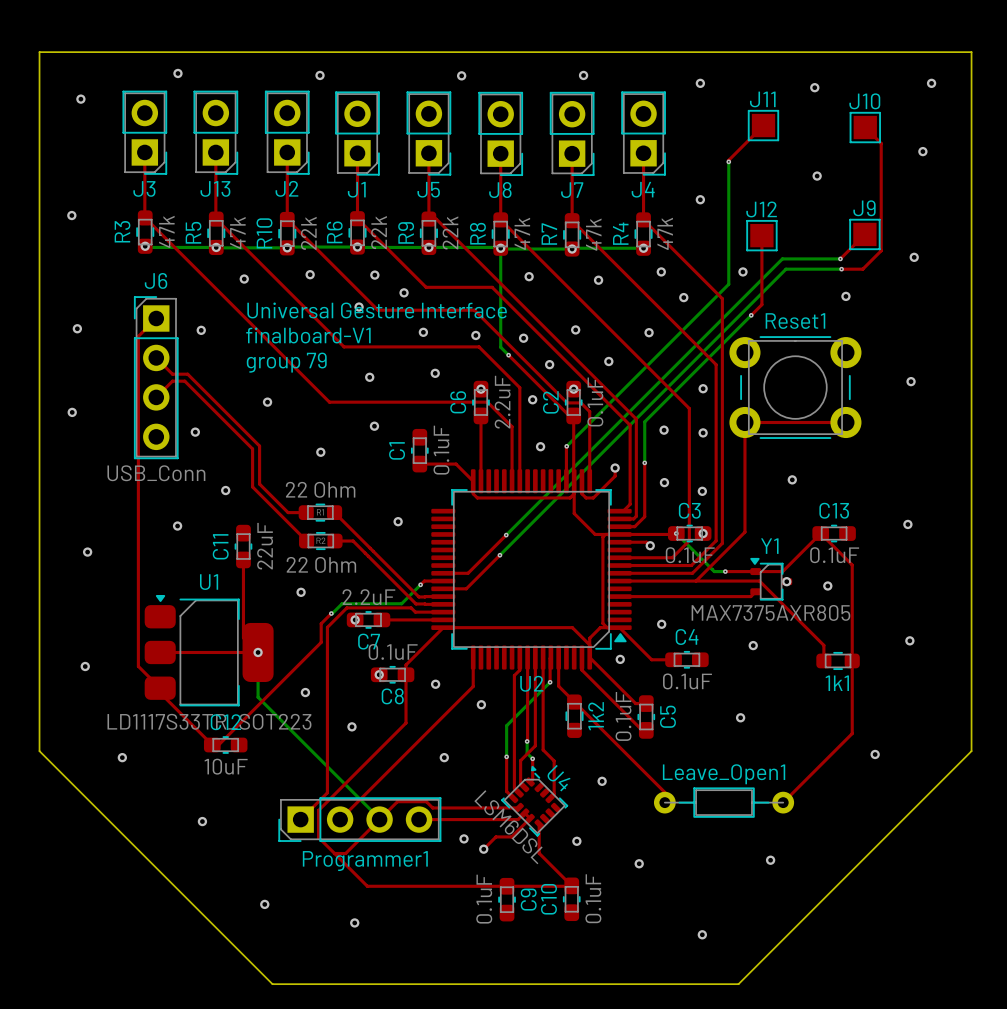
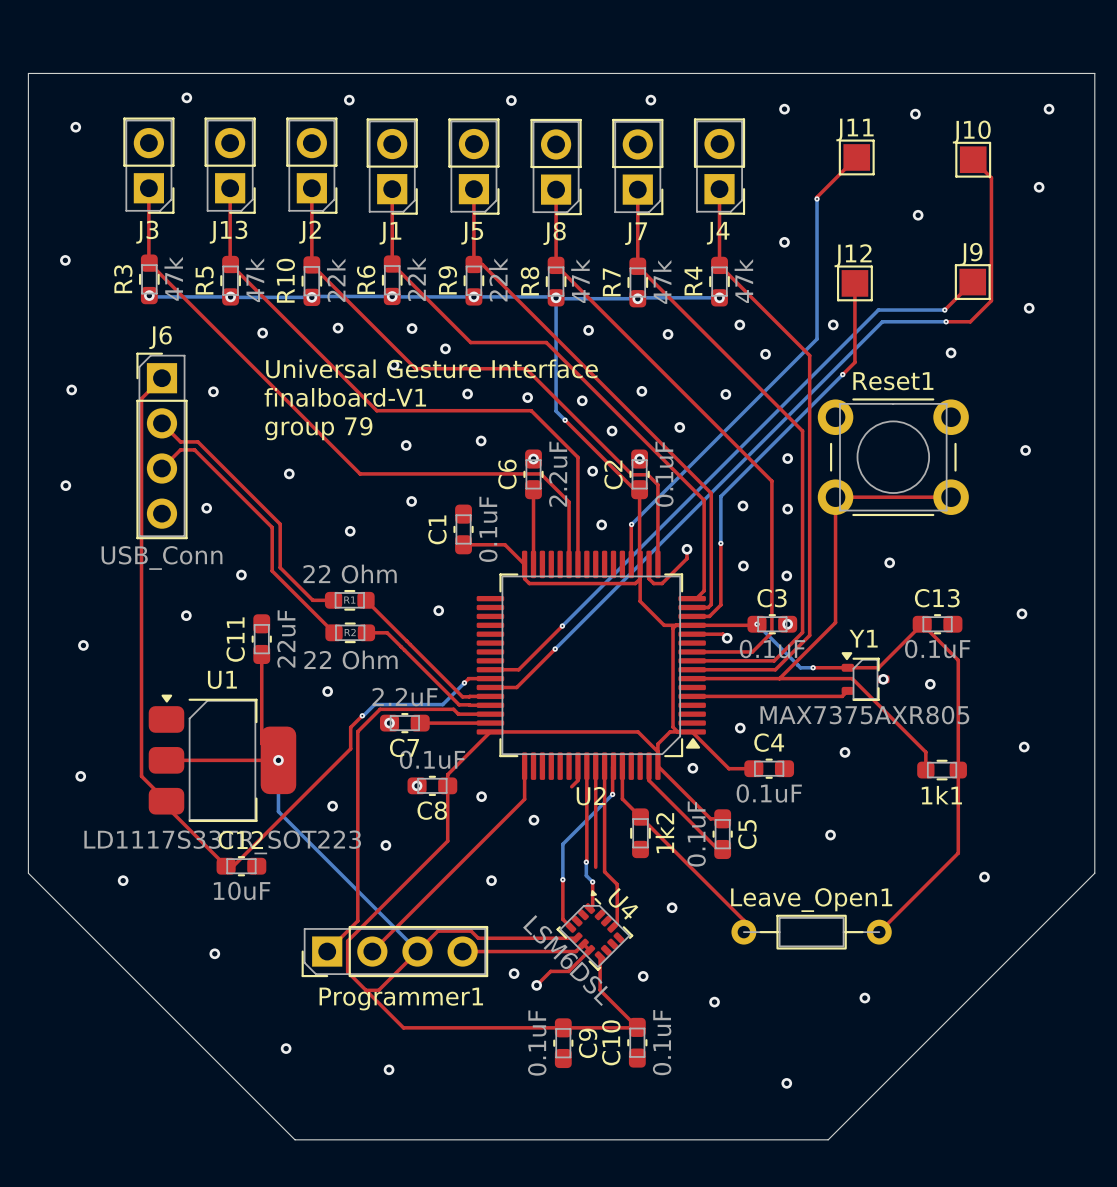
top track: (514, 675) (514, 788) (519, 792) -> none
top track: (535, 745) (520, 760) (520, 783) (524, 787) -> none

